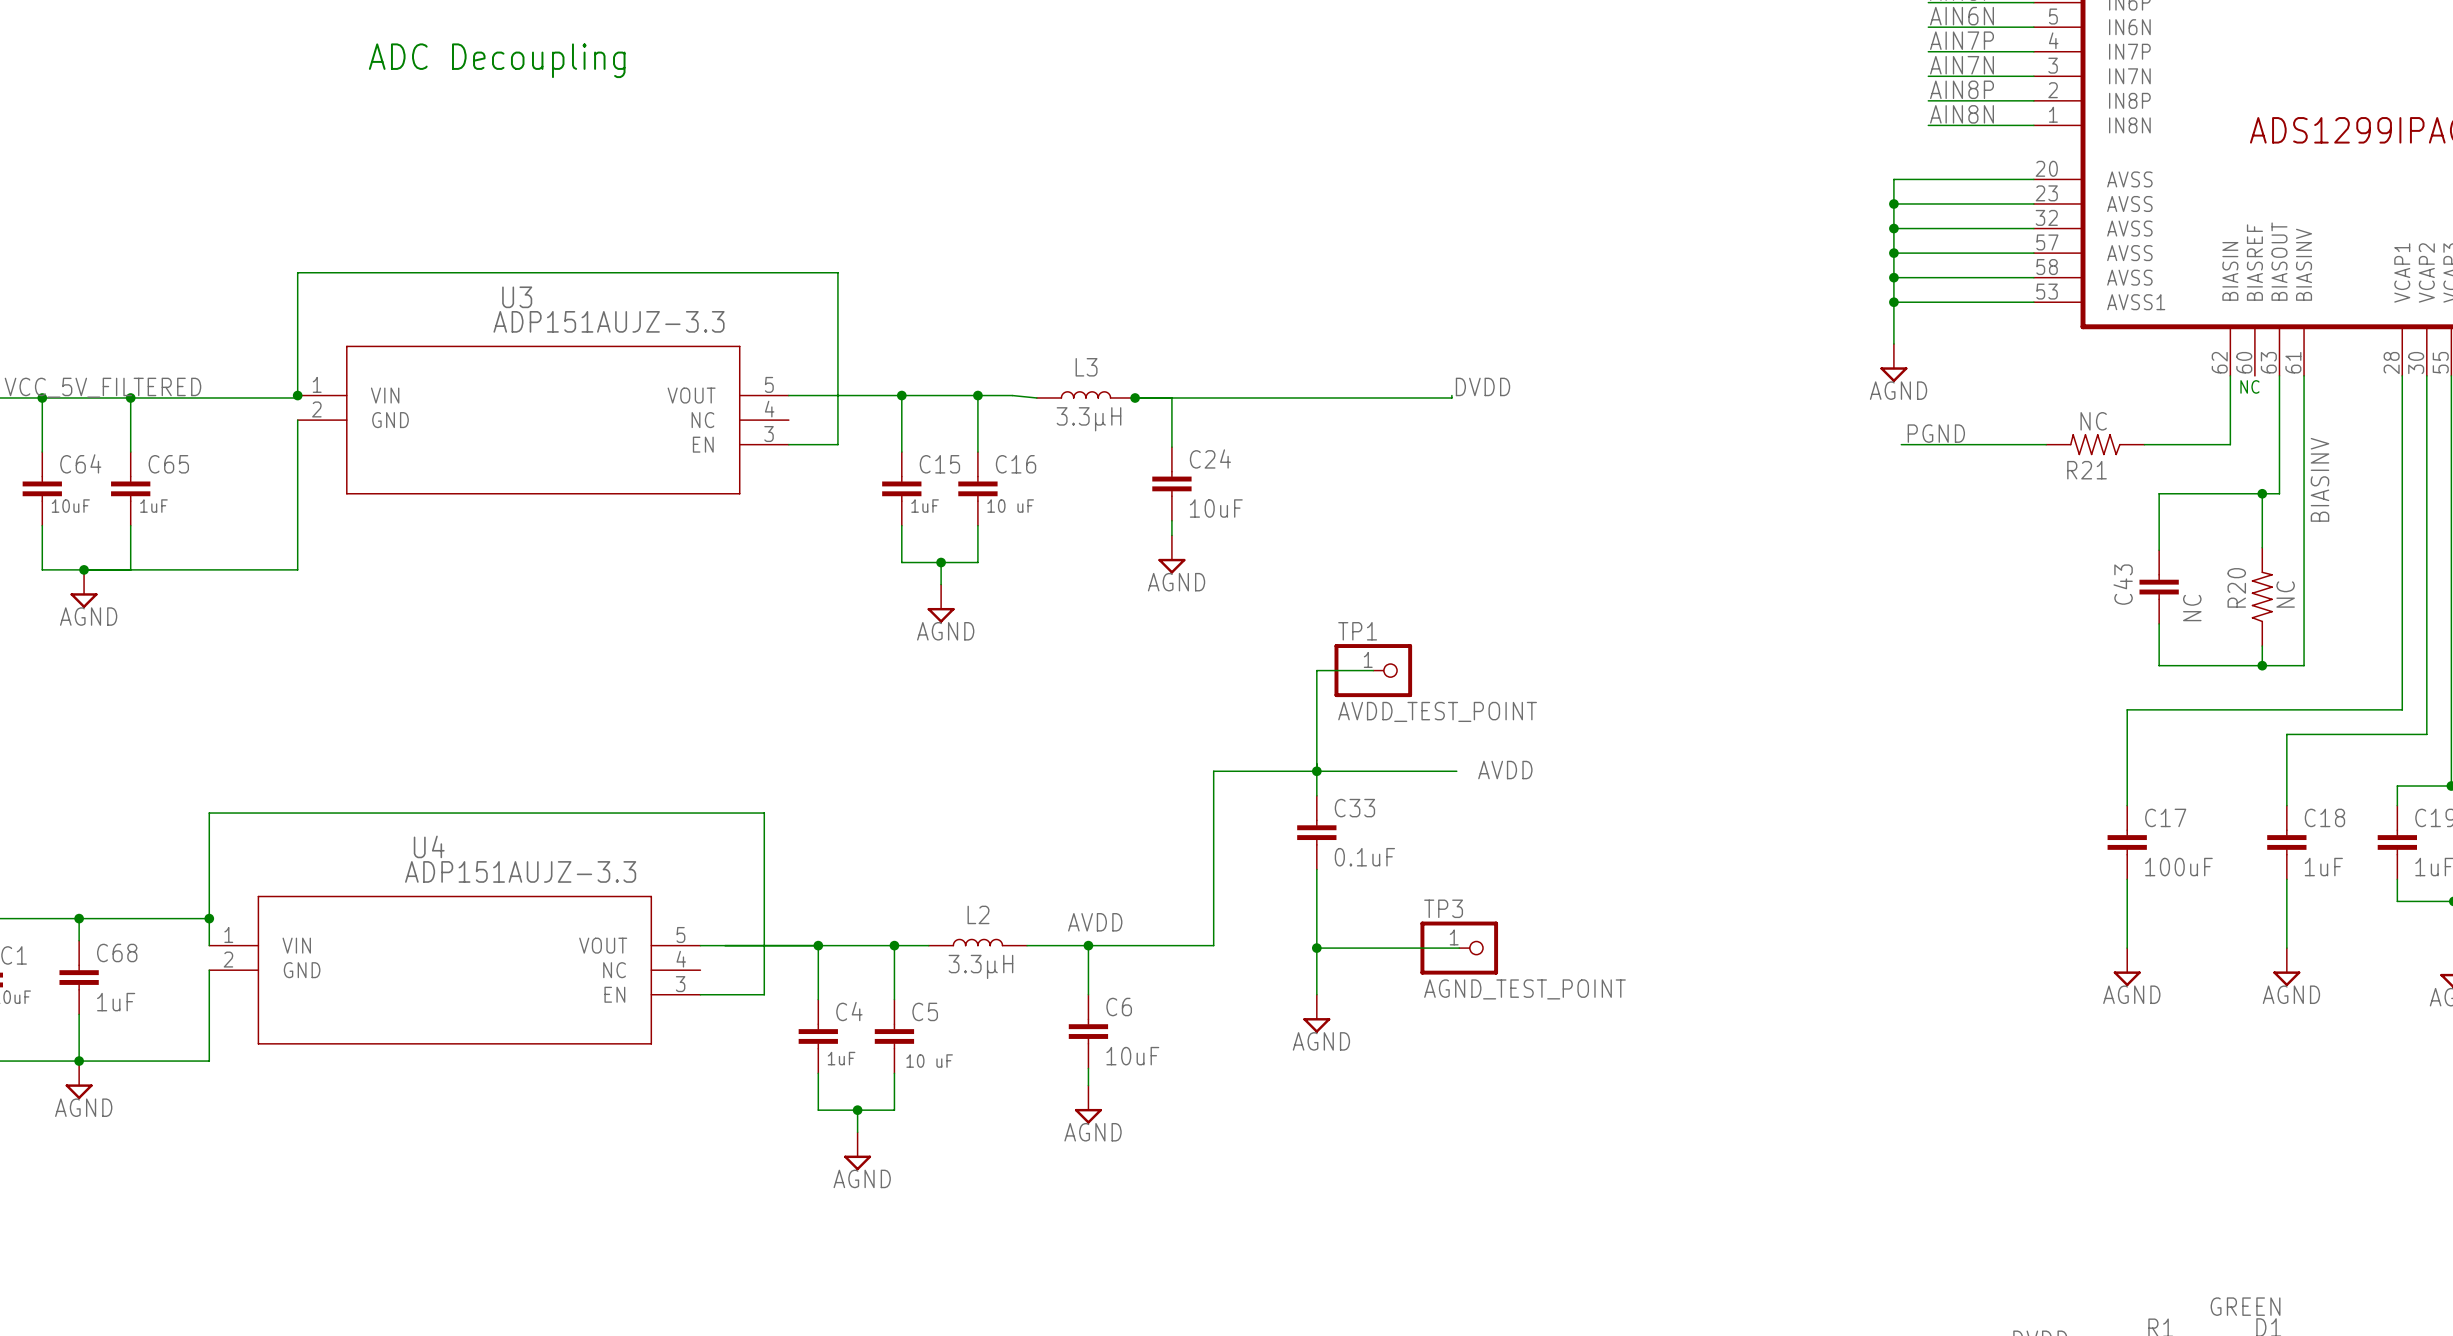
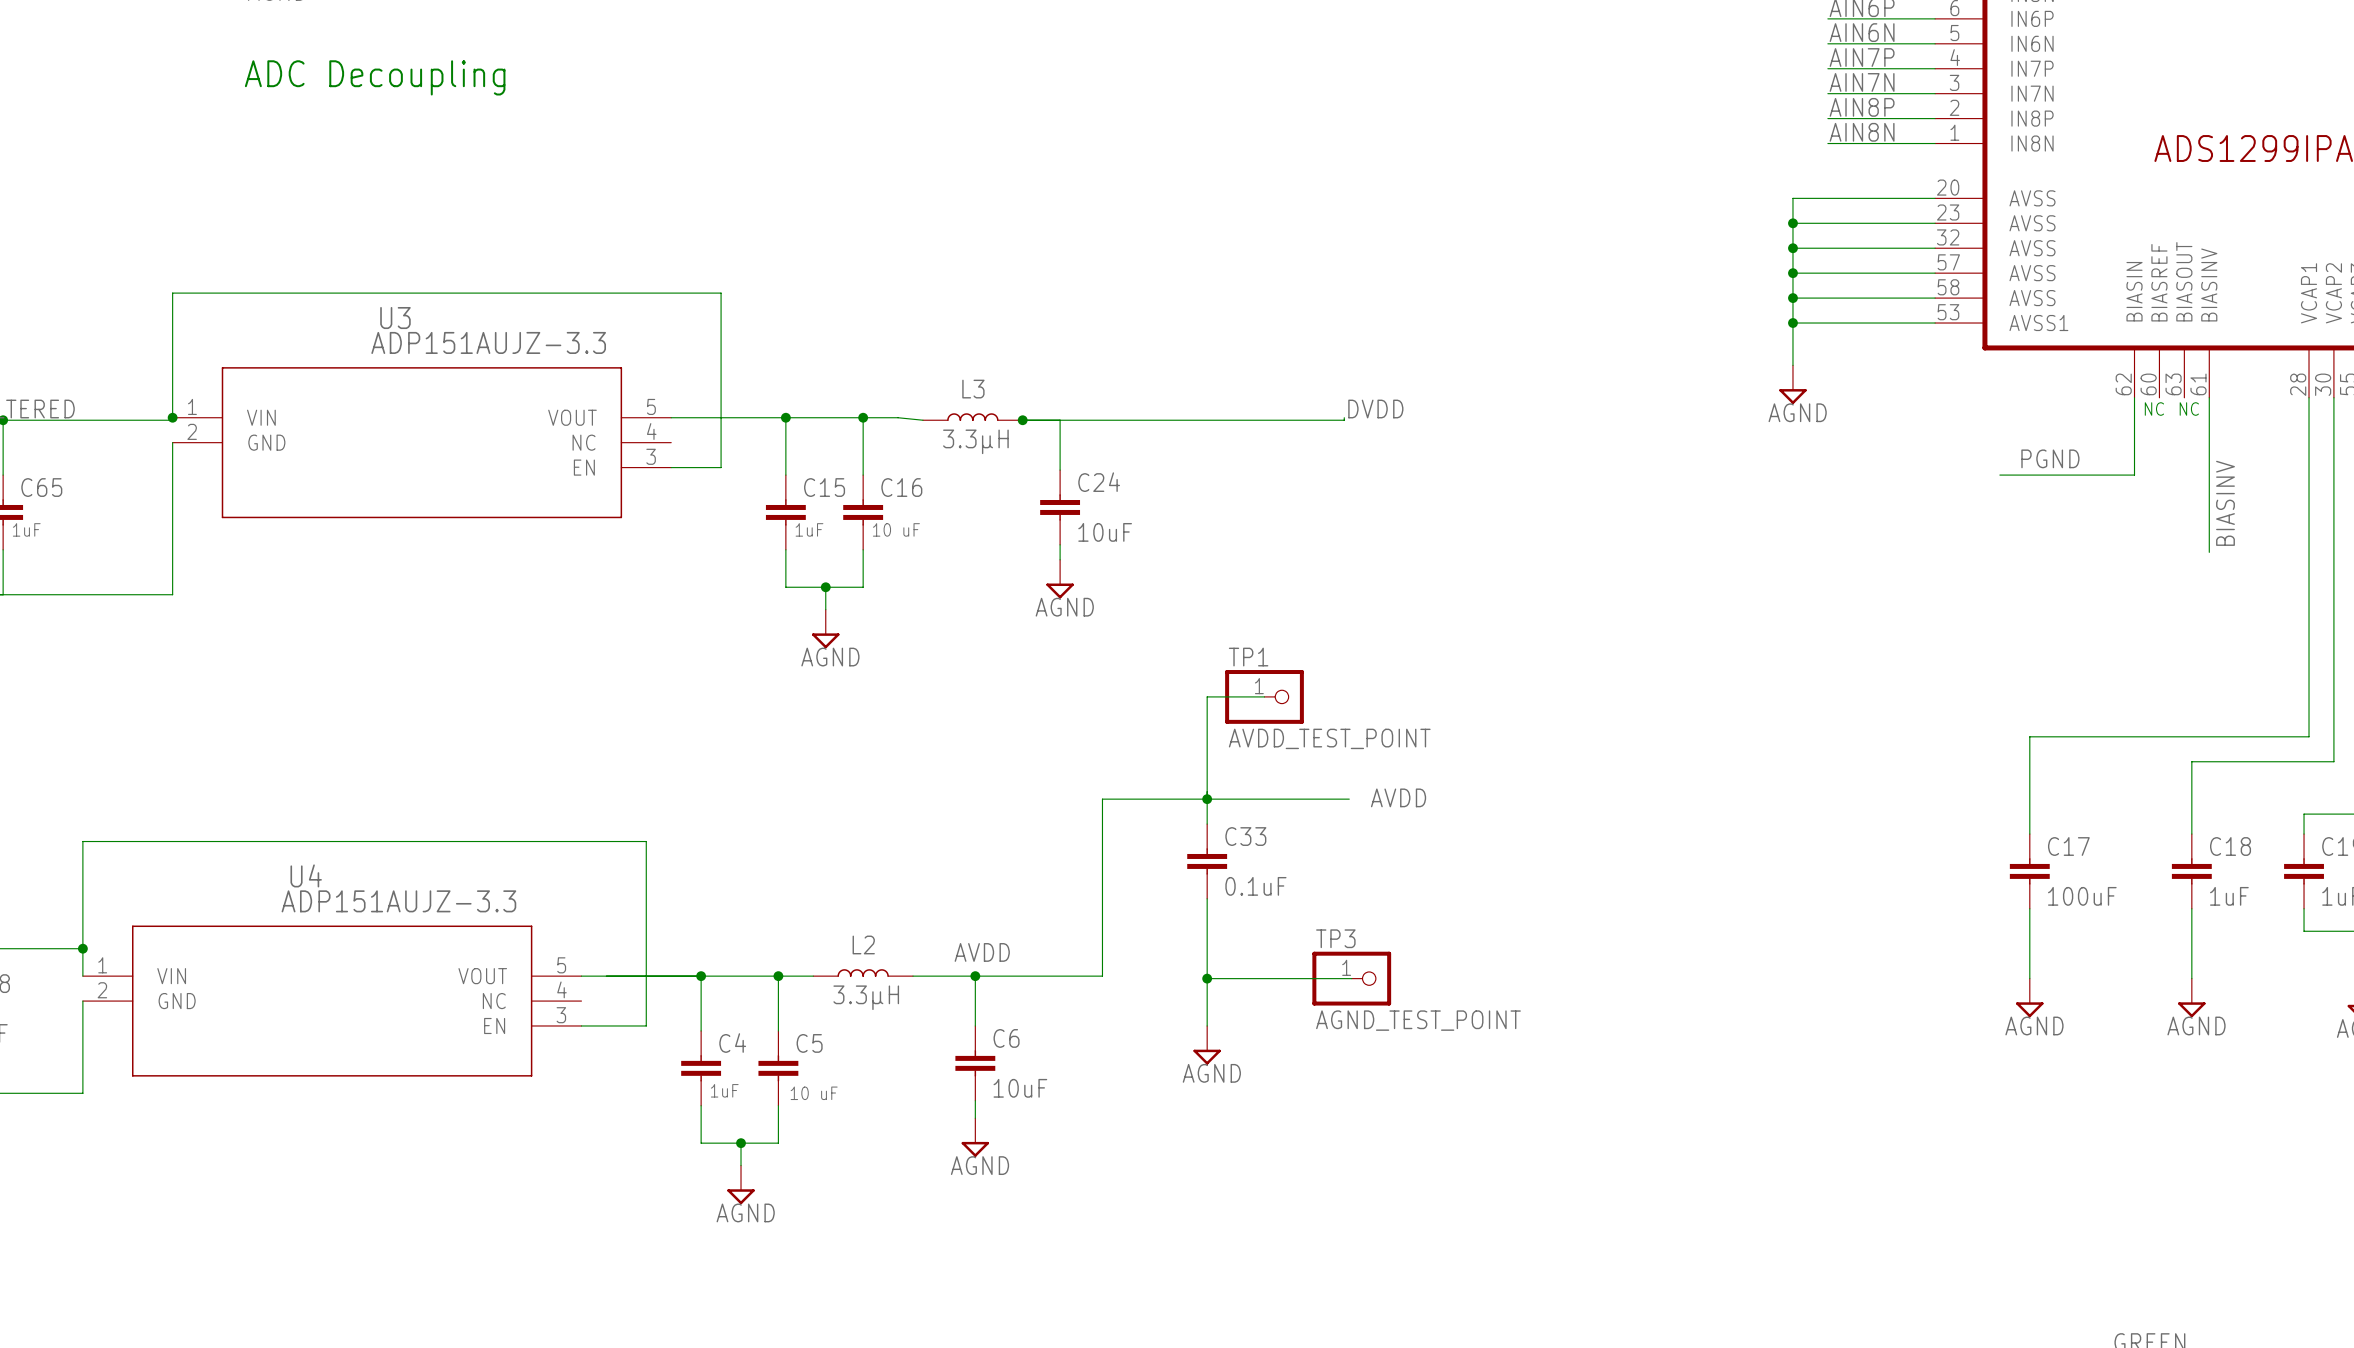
wire: (2279, 375) (2279, 493) (2159, 493) (2159, 550) -> none
text: none -> NC (2189, 409)
label position: PGND (1936, 433) -> PGND (2050, 458)
wire: (1901, 444) (2046, 444) -> none
R21: NC (2095, 444) -> none
wire: (2144, 444) (2230, 444) -> (1999, 475) (2134, 475) (2134, 467)
wire: (2262, 493) (2262, 547) -> none
junction: (2262, 493) -> none
wire: (2304, 528) (2304, 665) (2159, 665) (2159, 623) -> none
C43: NC (2159, 587) -> none
R20: NC (2262, 596) -> none
wire: (2262, 646) (2262, 665) -> none
junction: (2262, 665) -> none

